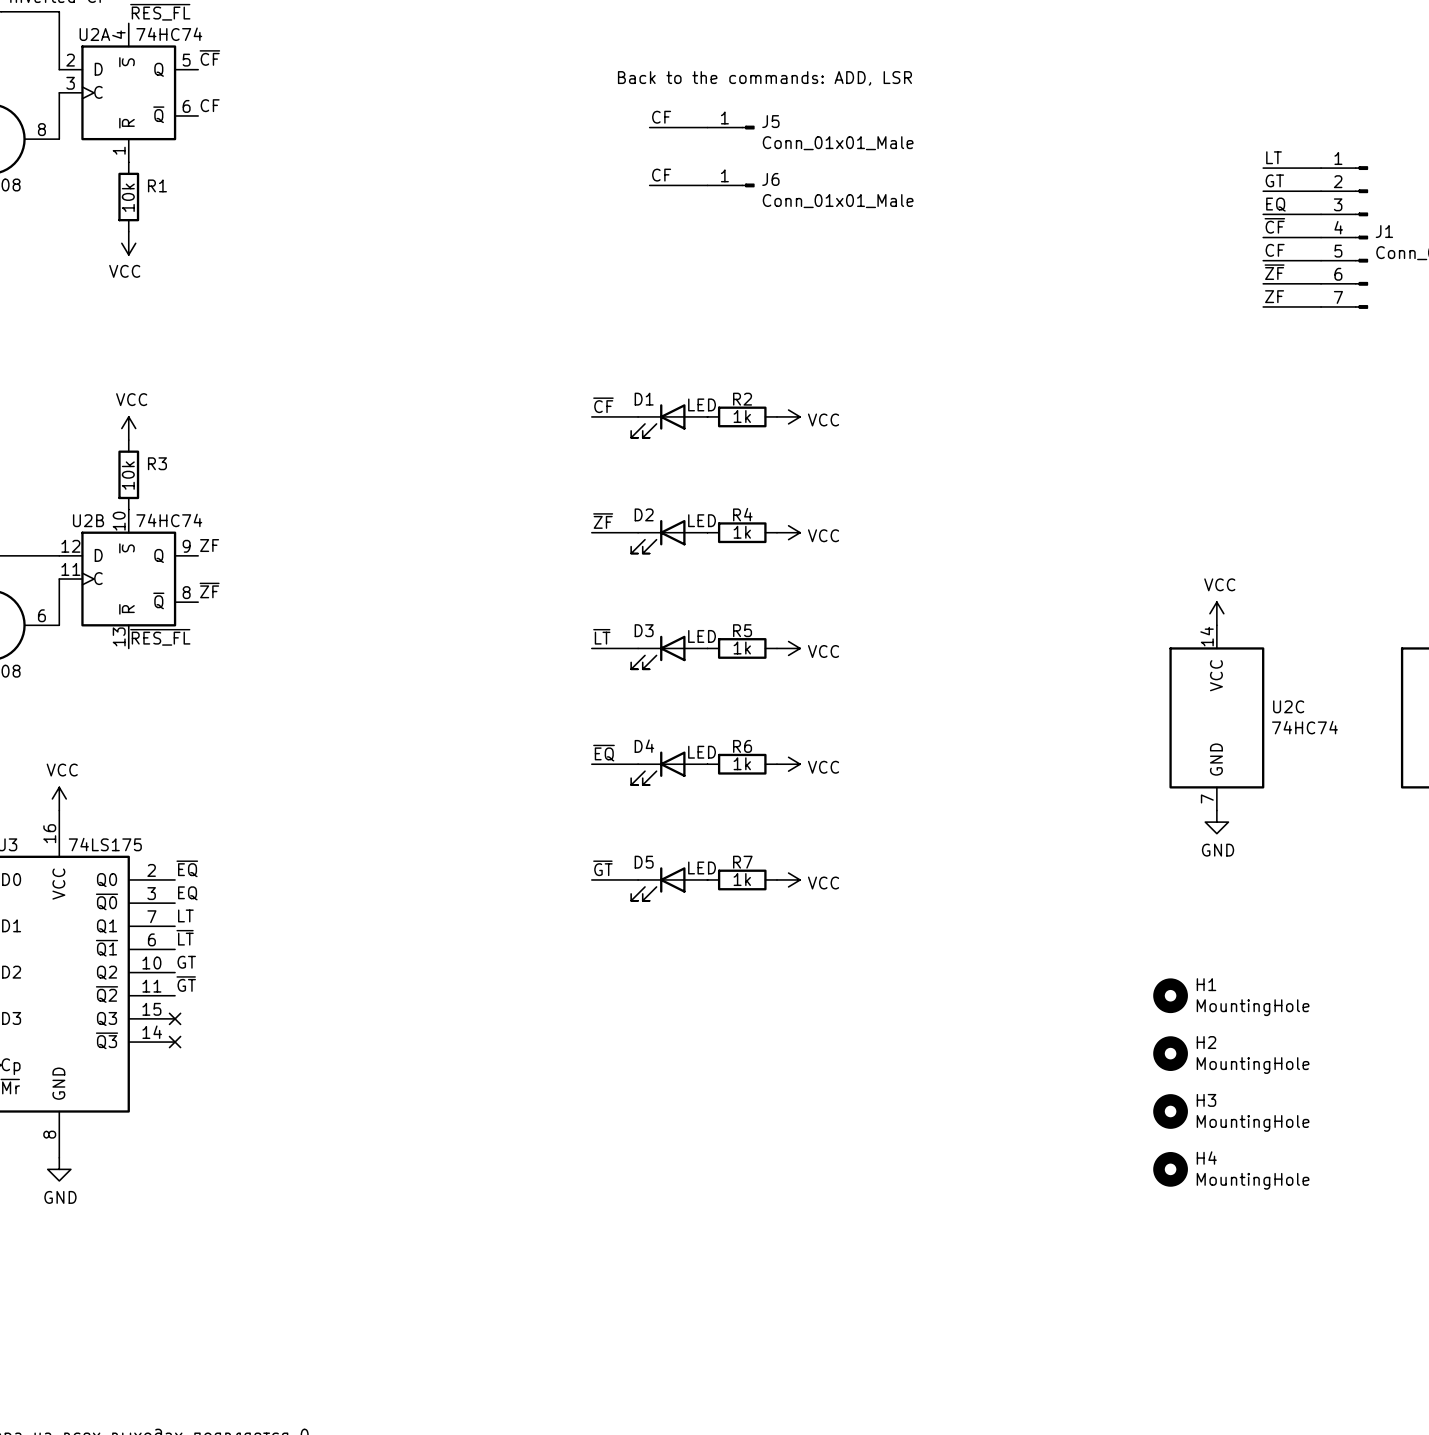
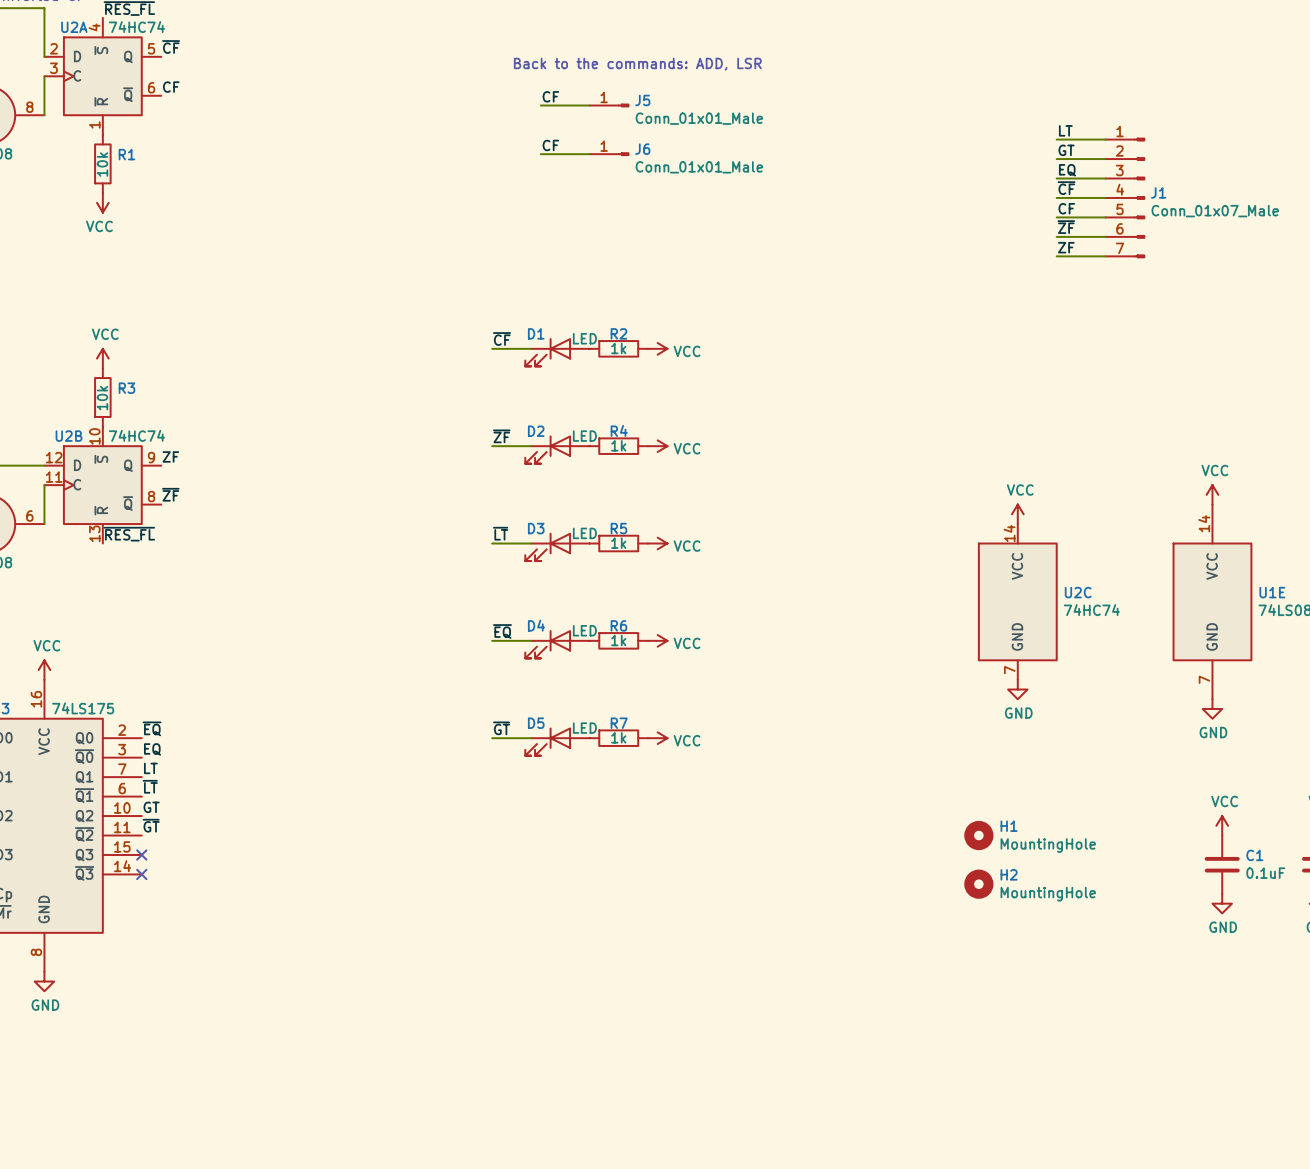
H3: MountingHole (1170, 1111) -> none
H4: MountingHole (1170, 1169) -> none

